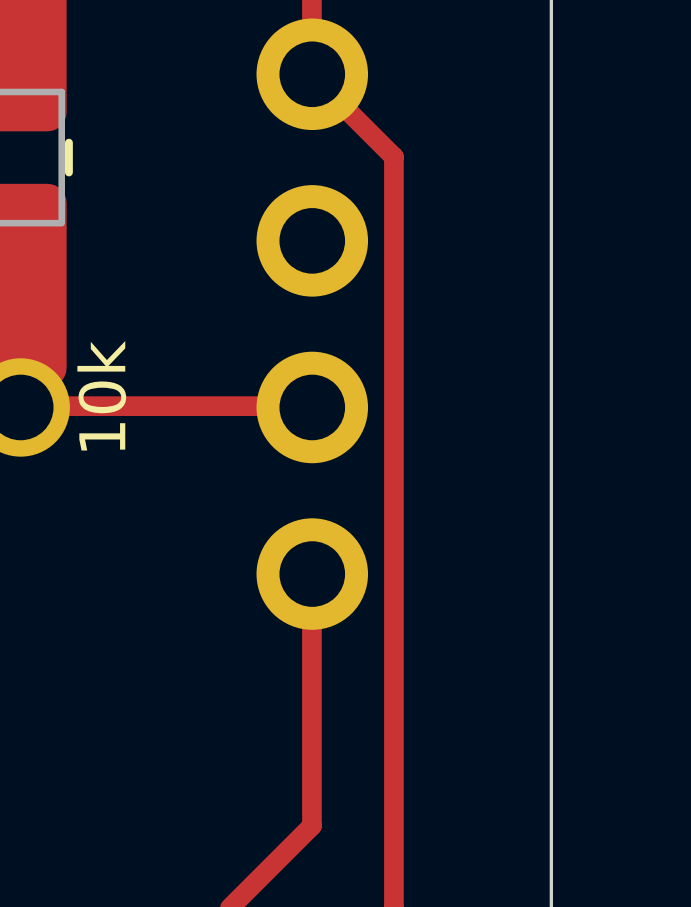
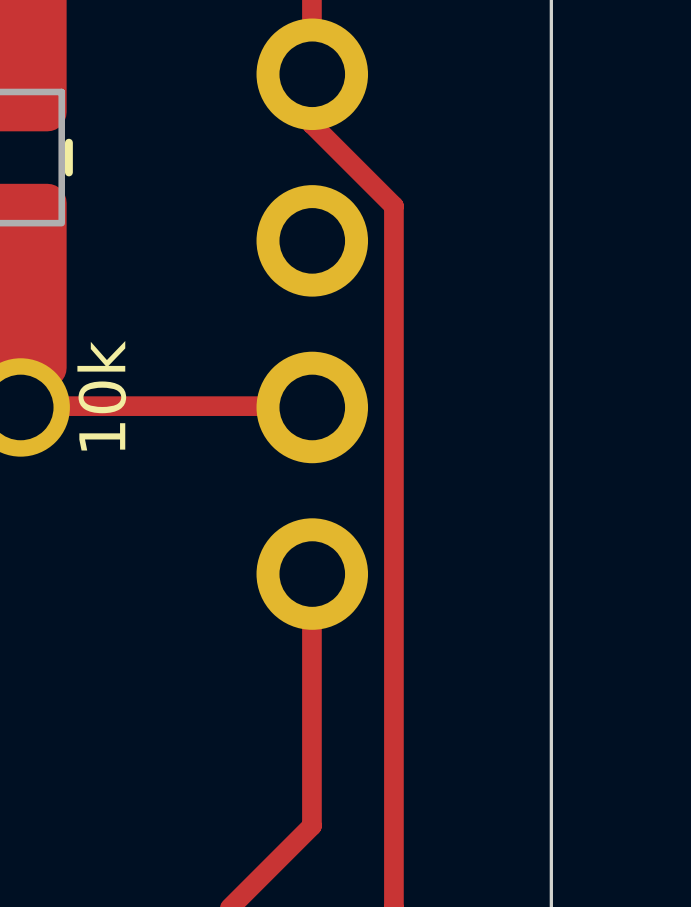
track: (311, 74) (393, 156) (393, 206) -> (311, 74) (311, 124) (393, 206)

